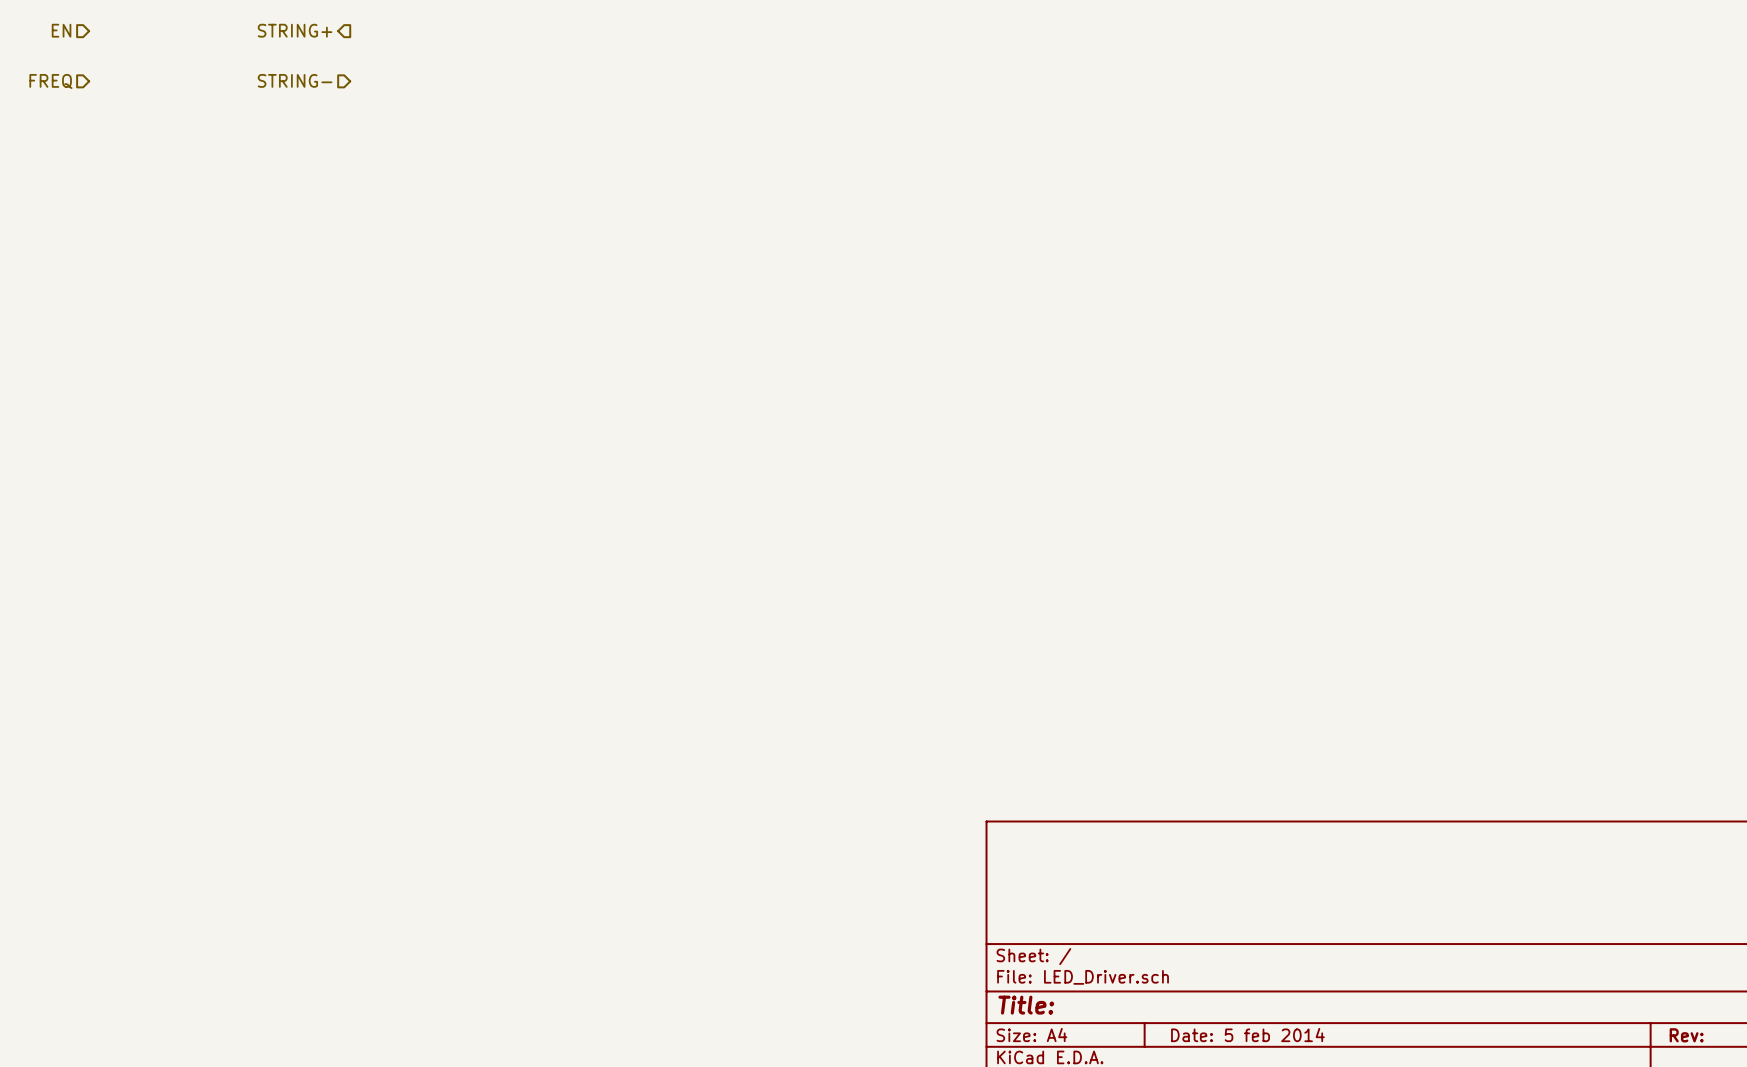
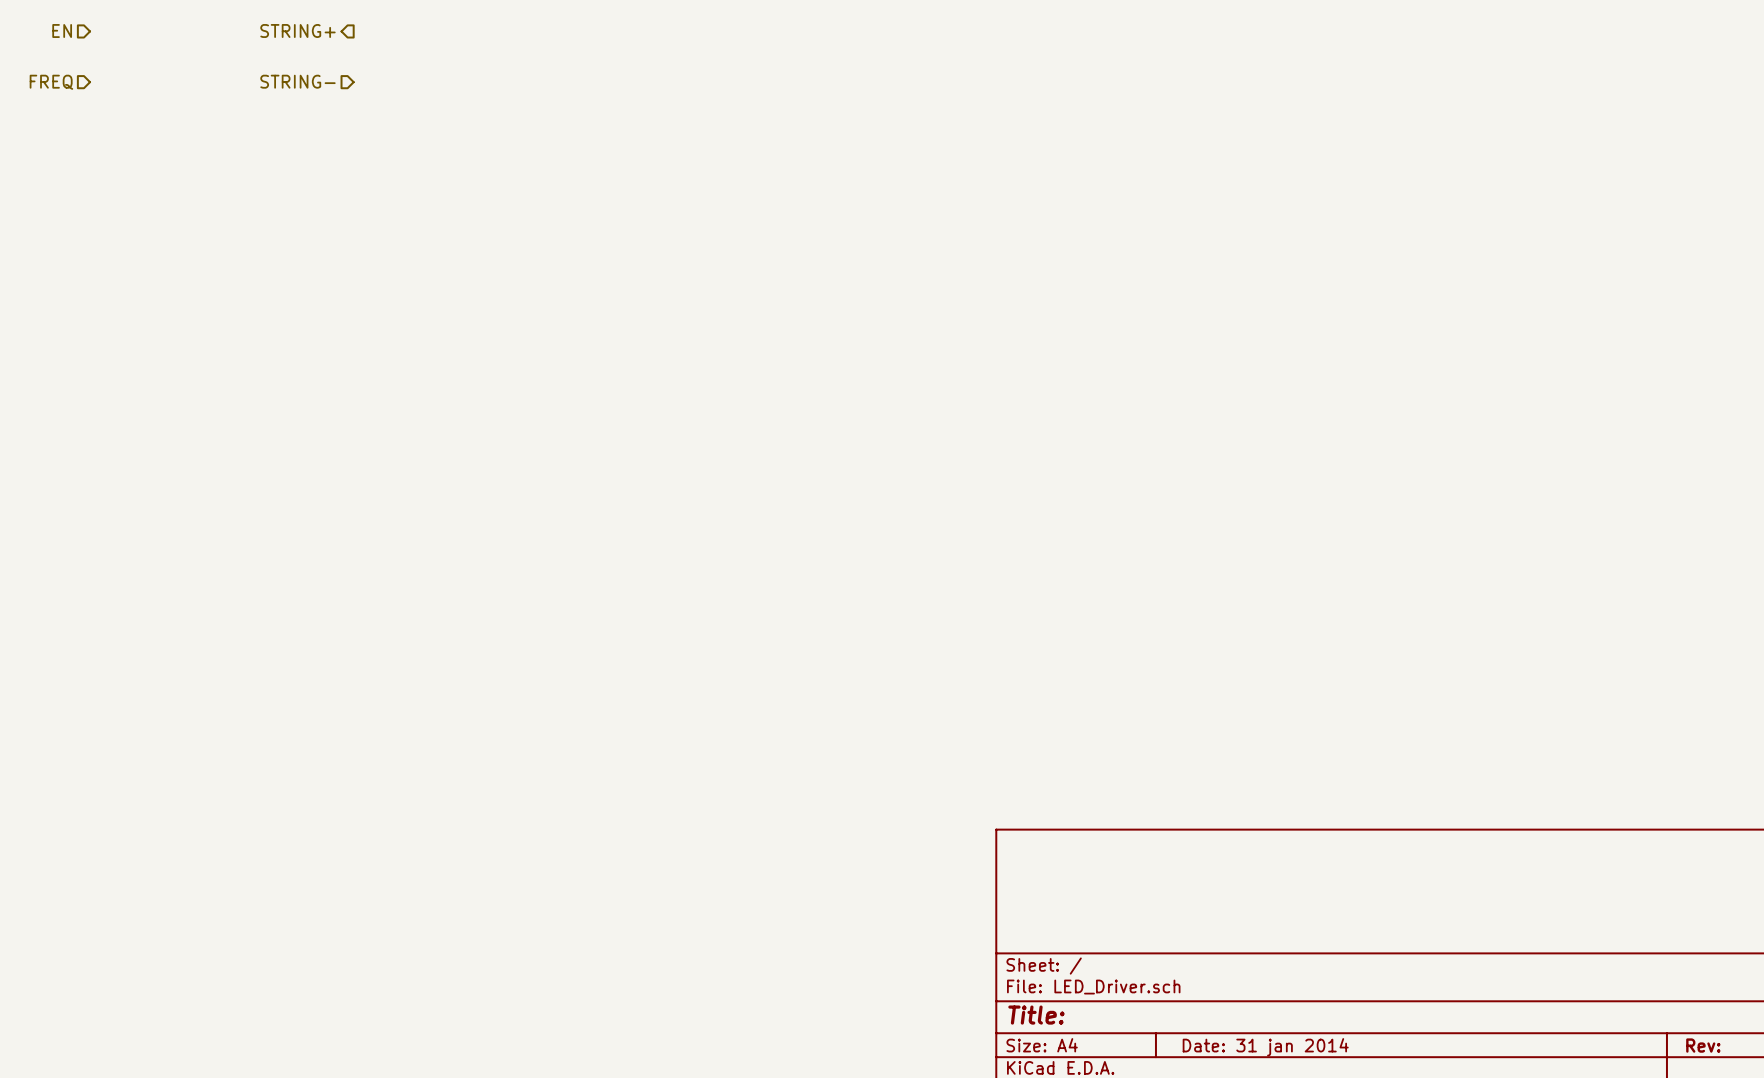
title block: Date: 5 feb 2014 (1247, 1035) -> Date: 31 jan 2014 (1265, 1047)

